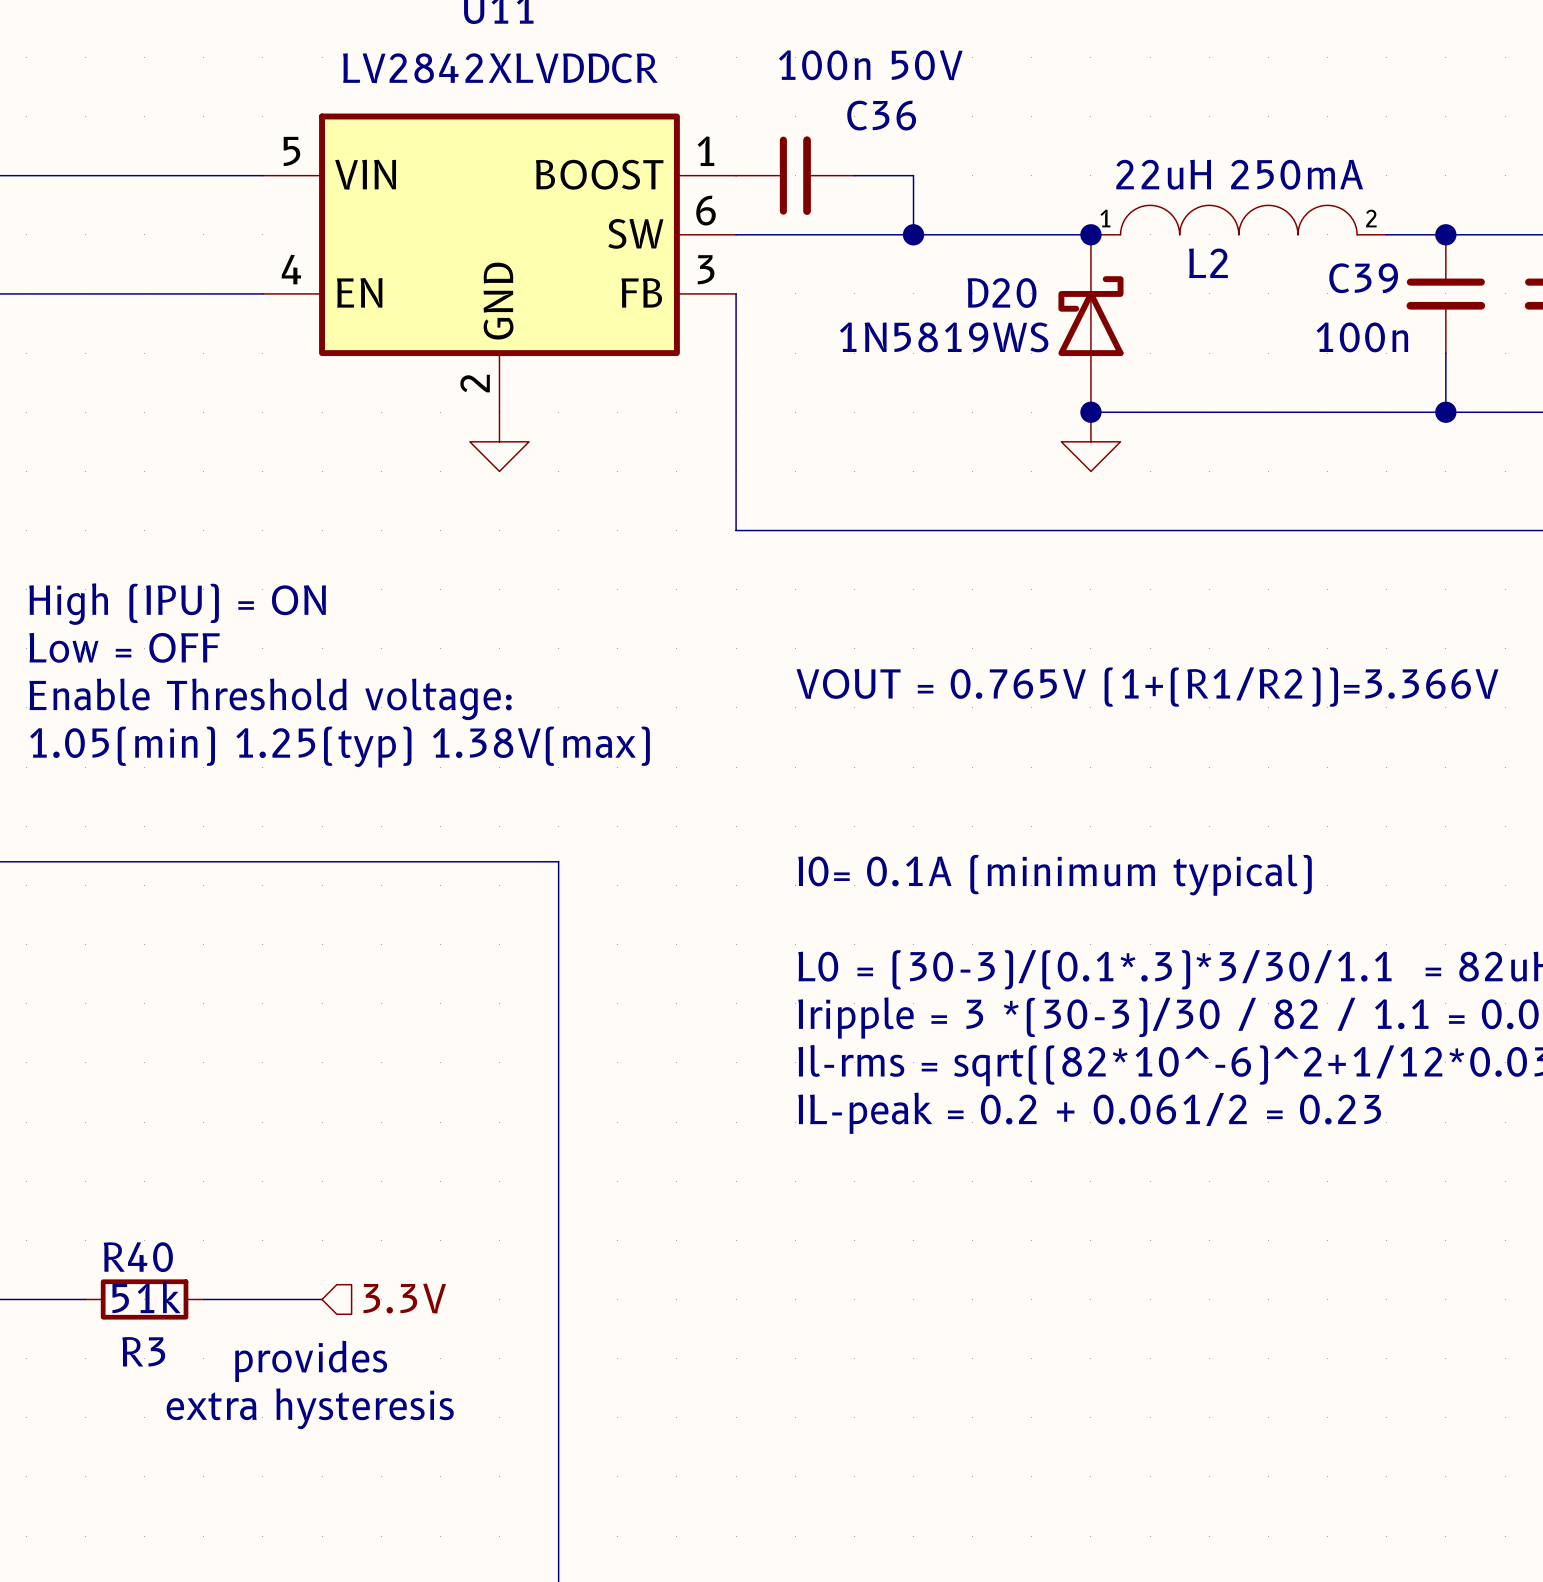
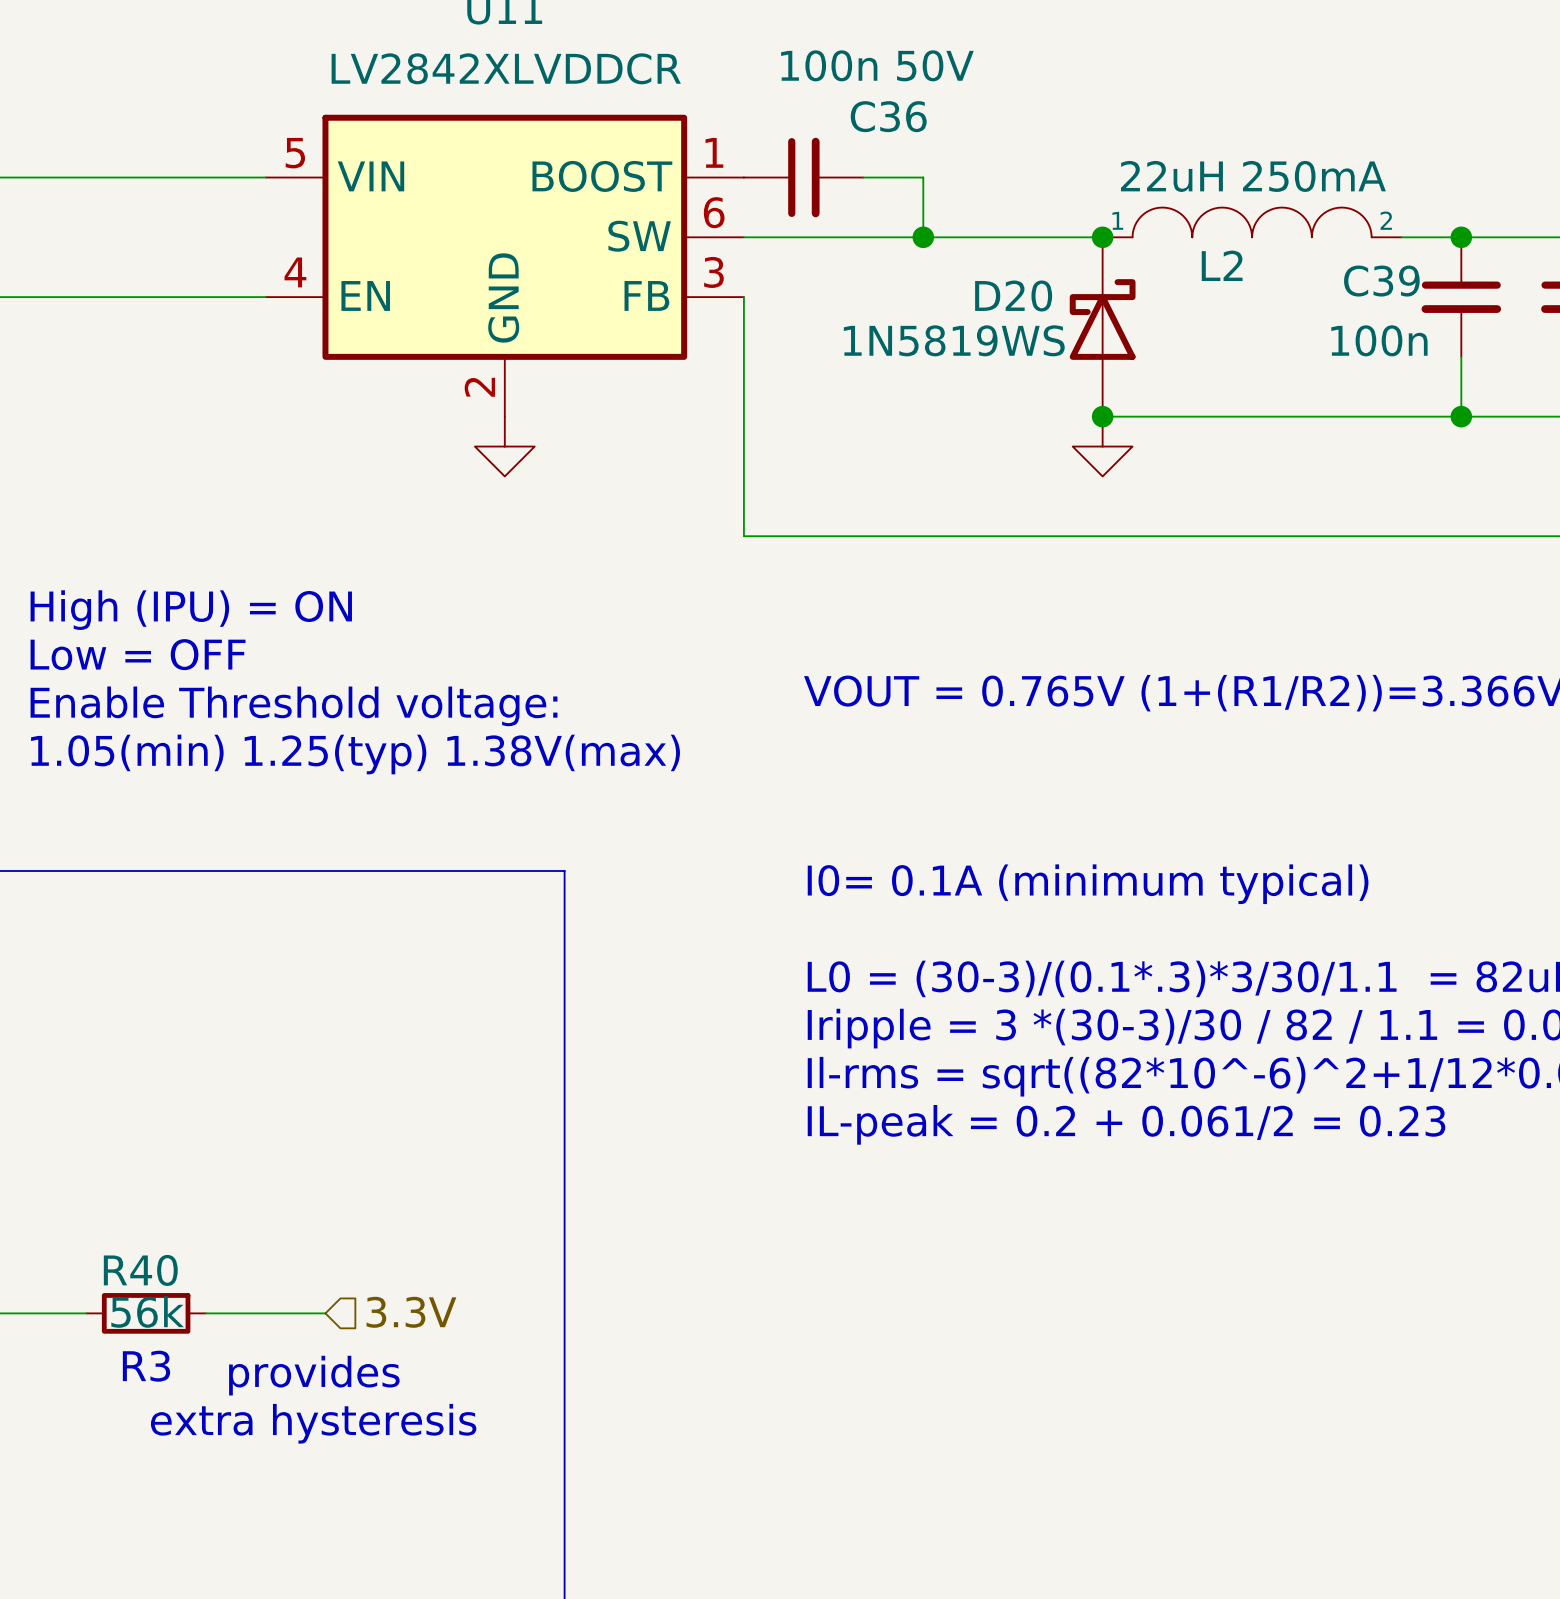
R40 value: 51k (146, 1297) -> 56k (147, 1311)

